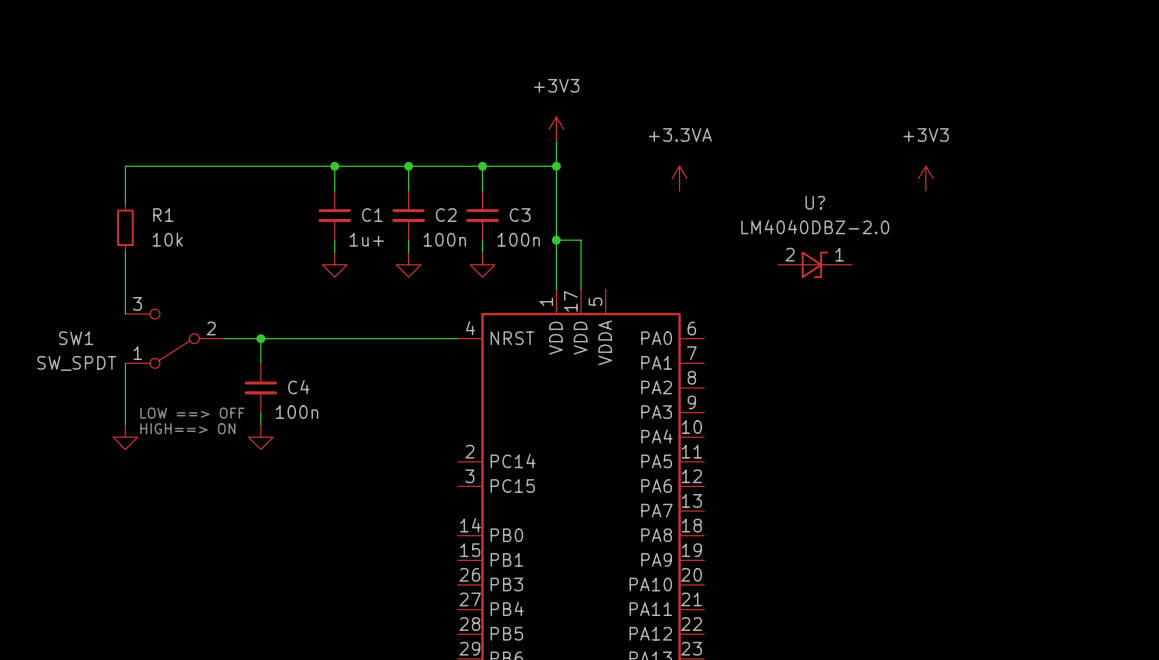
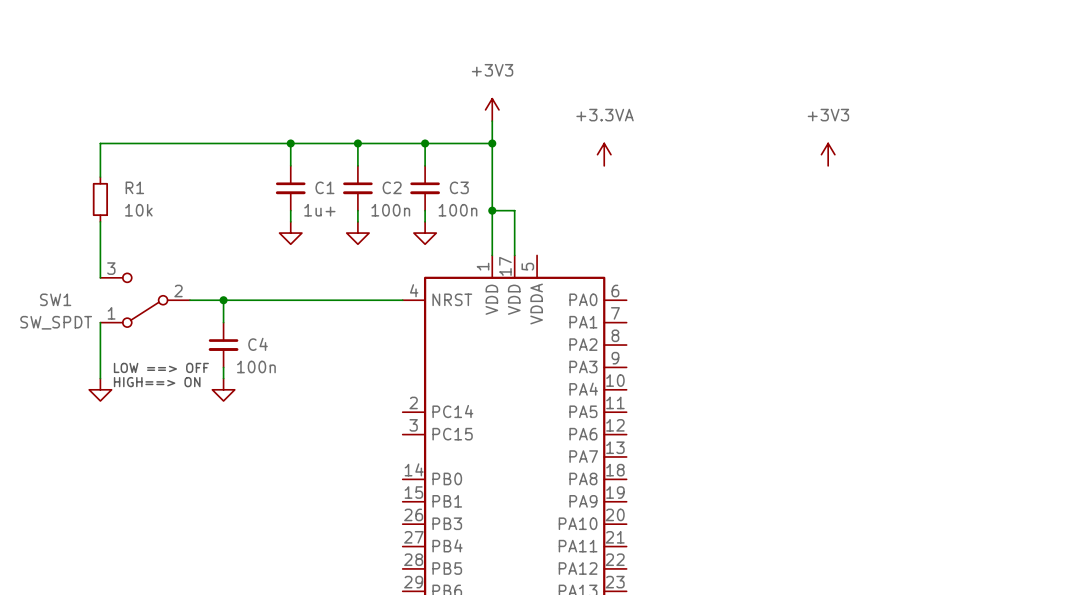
U?: LM4040DBZ-2.0 (815, 264) -> none

